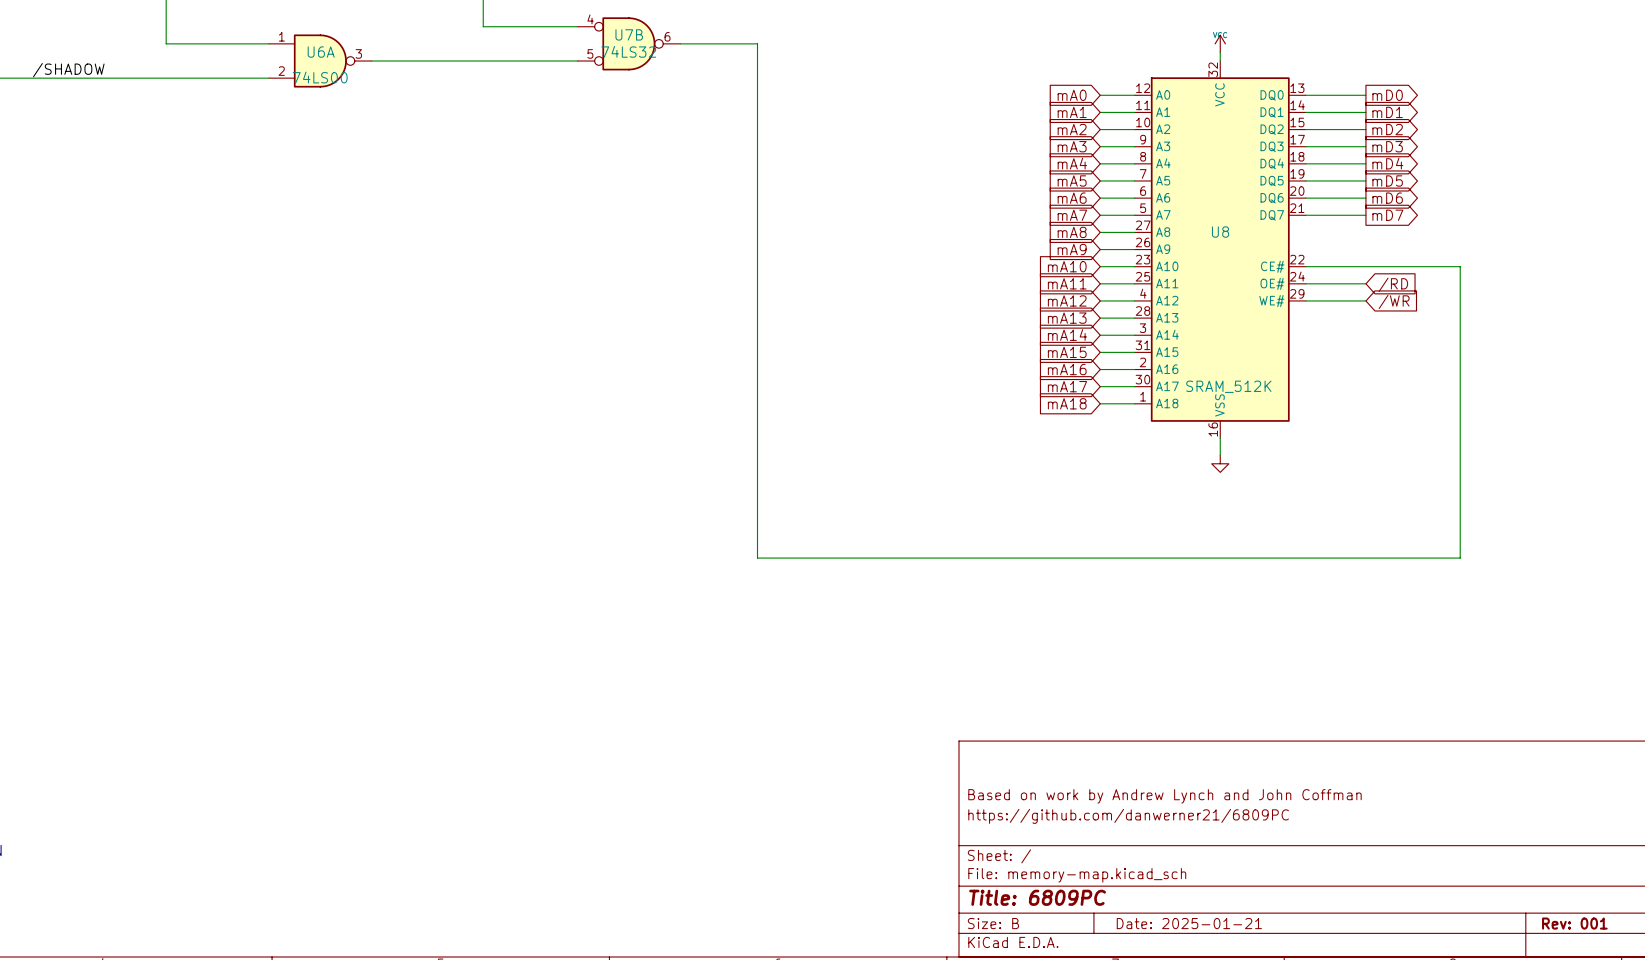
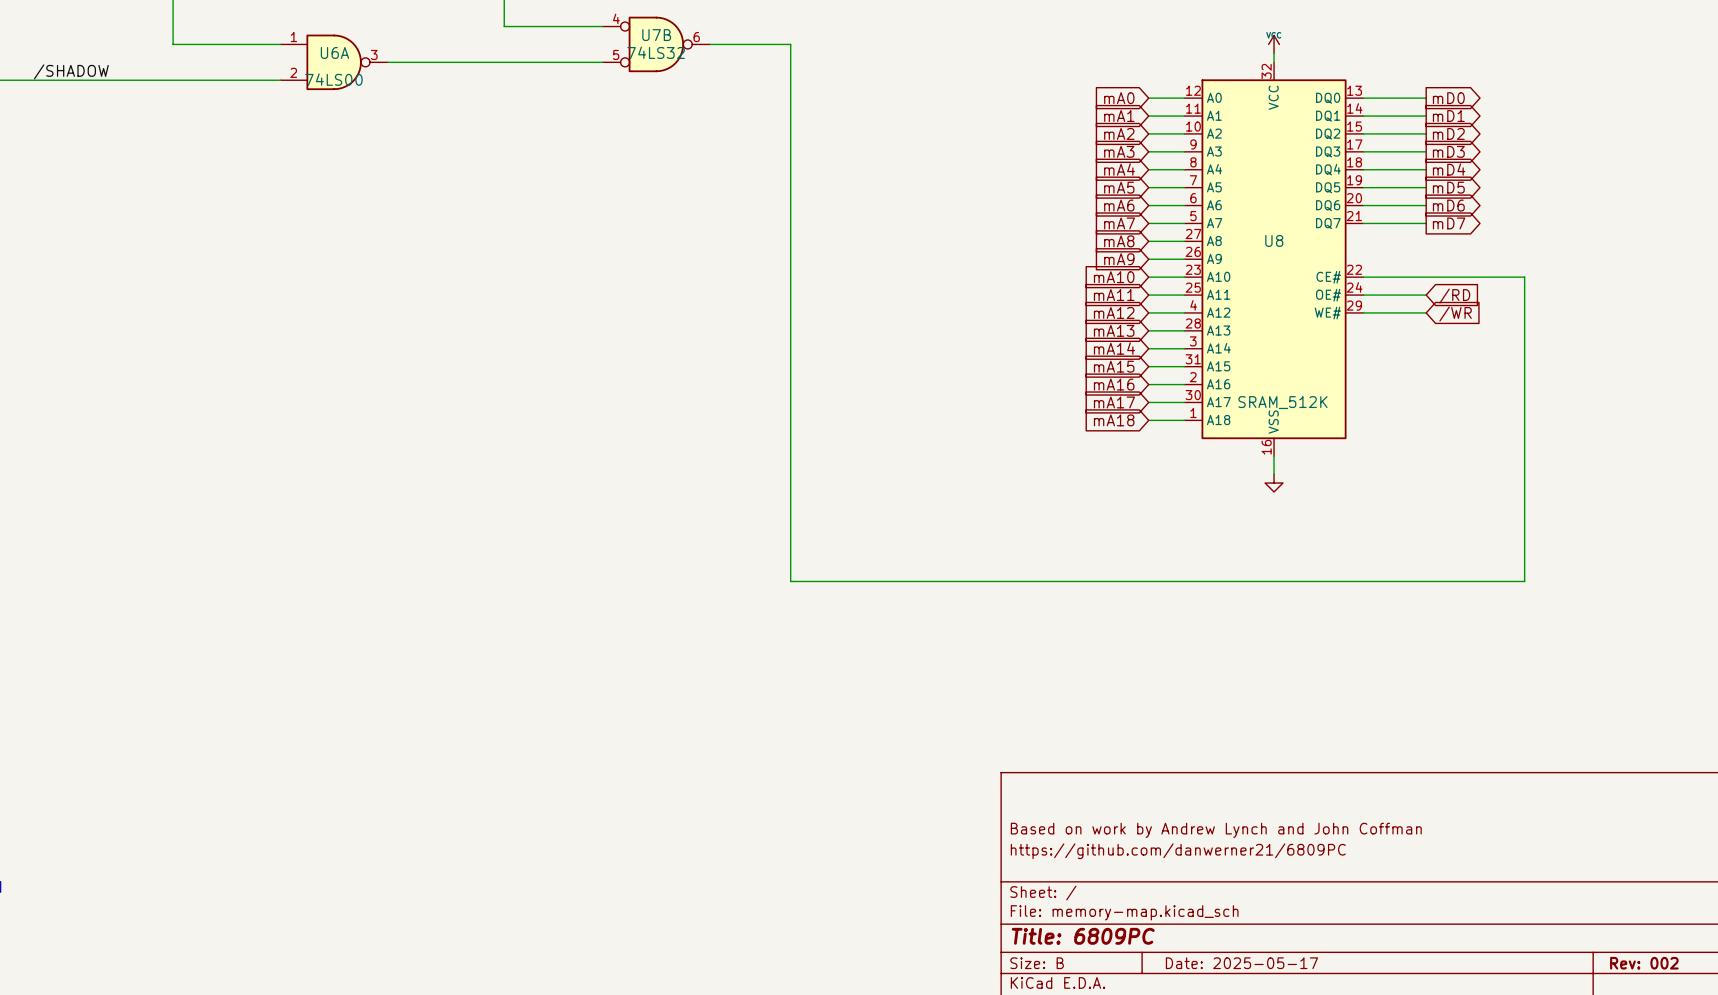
title block: Date: 2025-01-21 (1189, 923) -> Date: 2025-05-17 (1241, 963)
title block: Rev: 001 (1574, 923) -> Rev: 002 (1644, 963)

